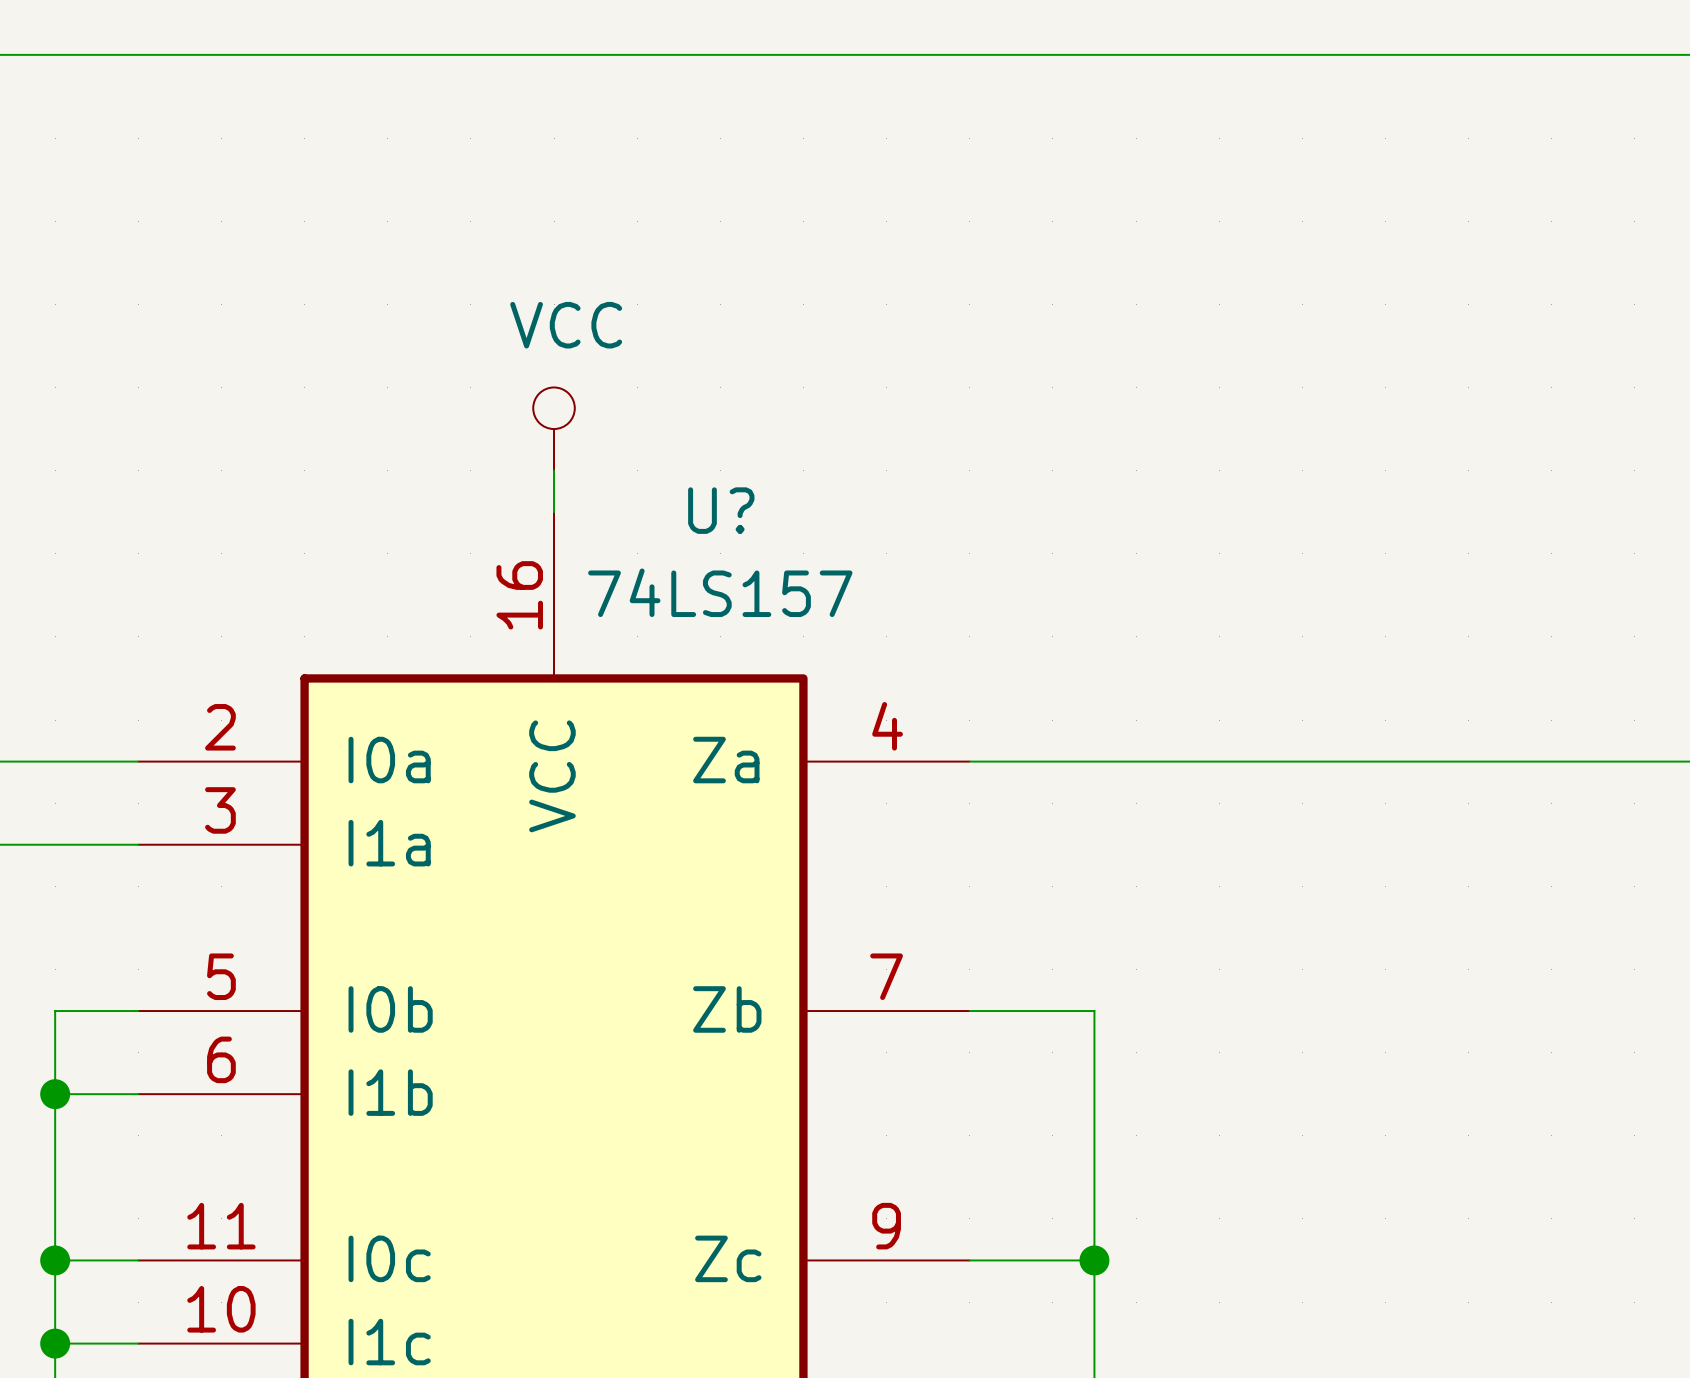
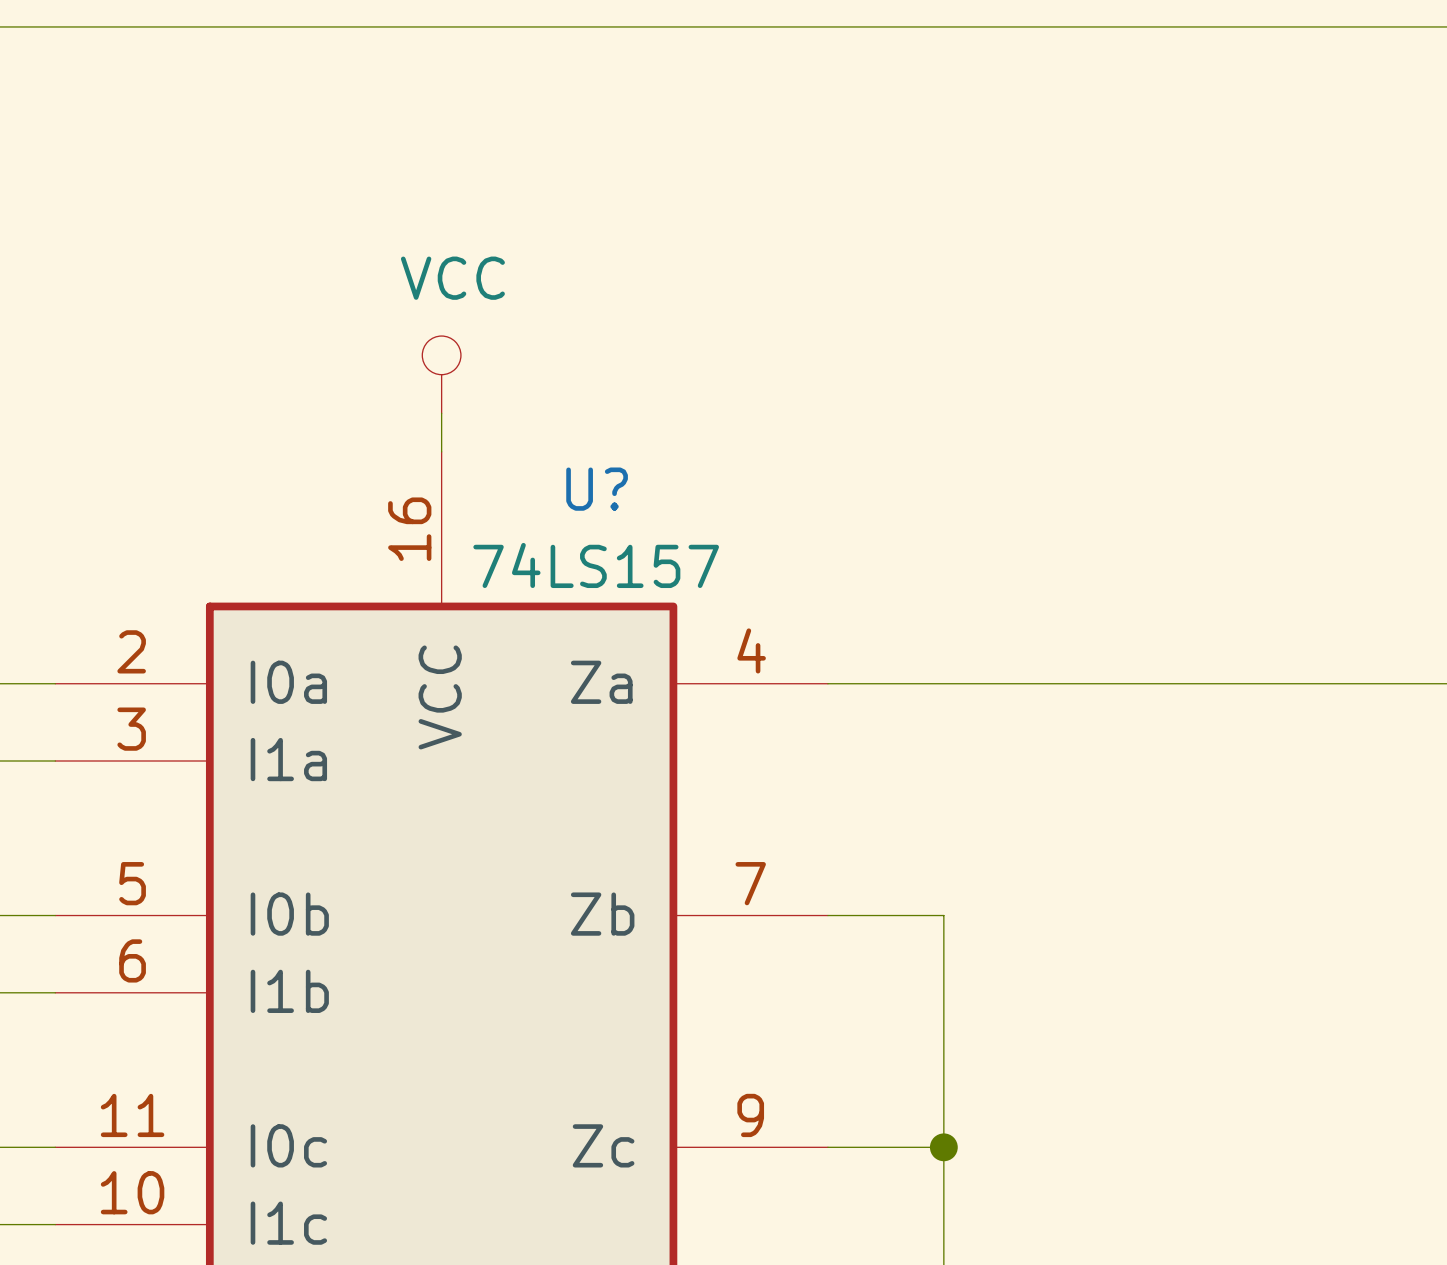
U? name position: U? (721, 510) -> U? (597, 489)
U? value position: 74LS157 (720, 592) -> 74LS157 (596, 565)

